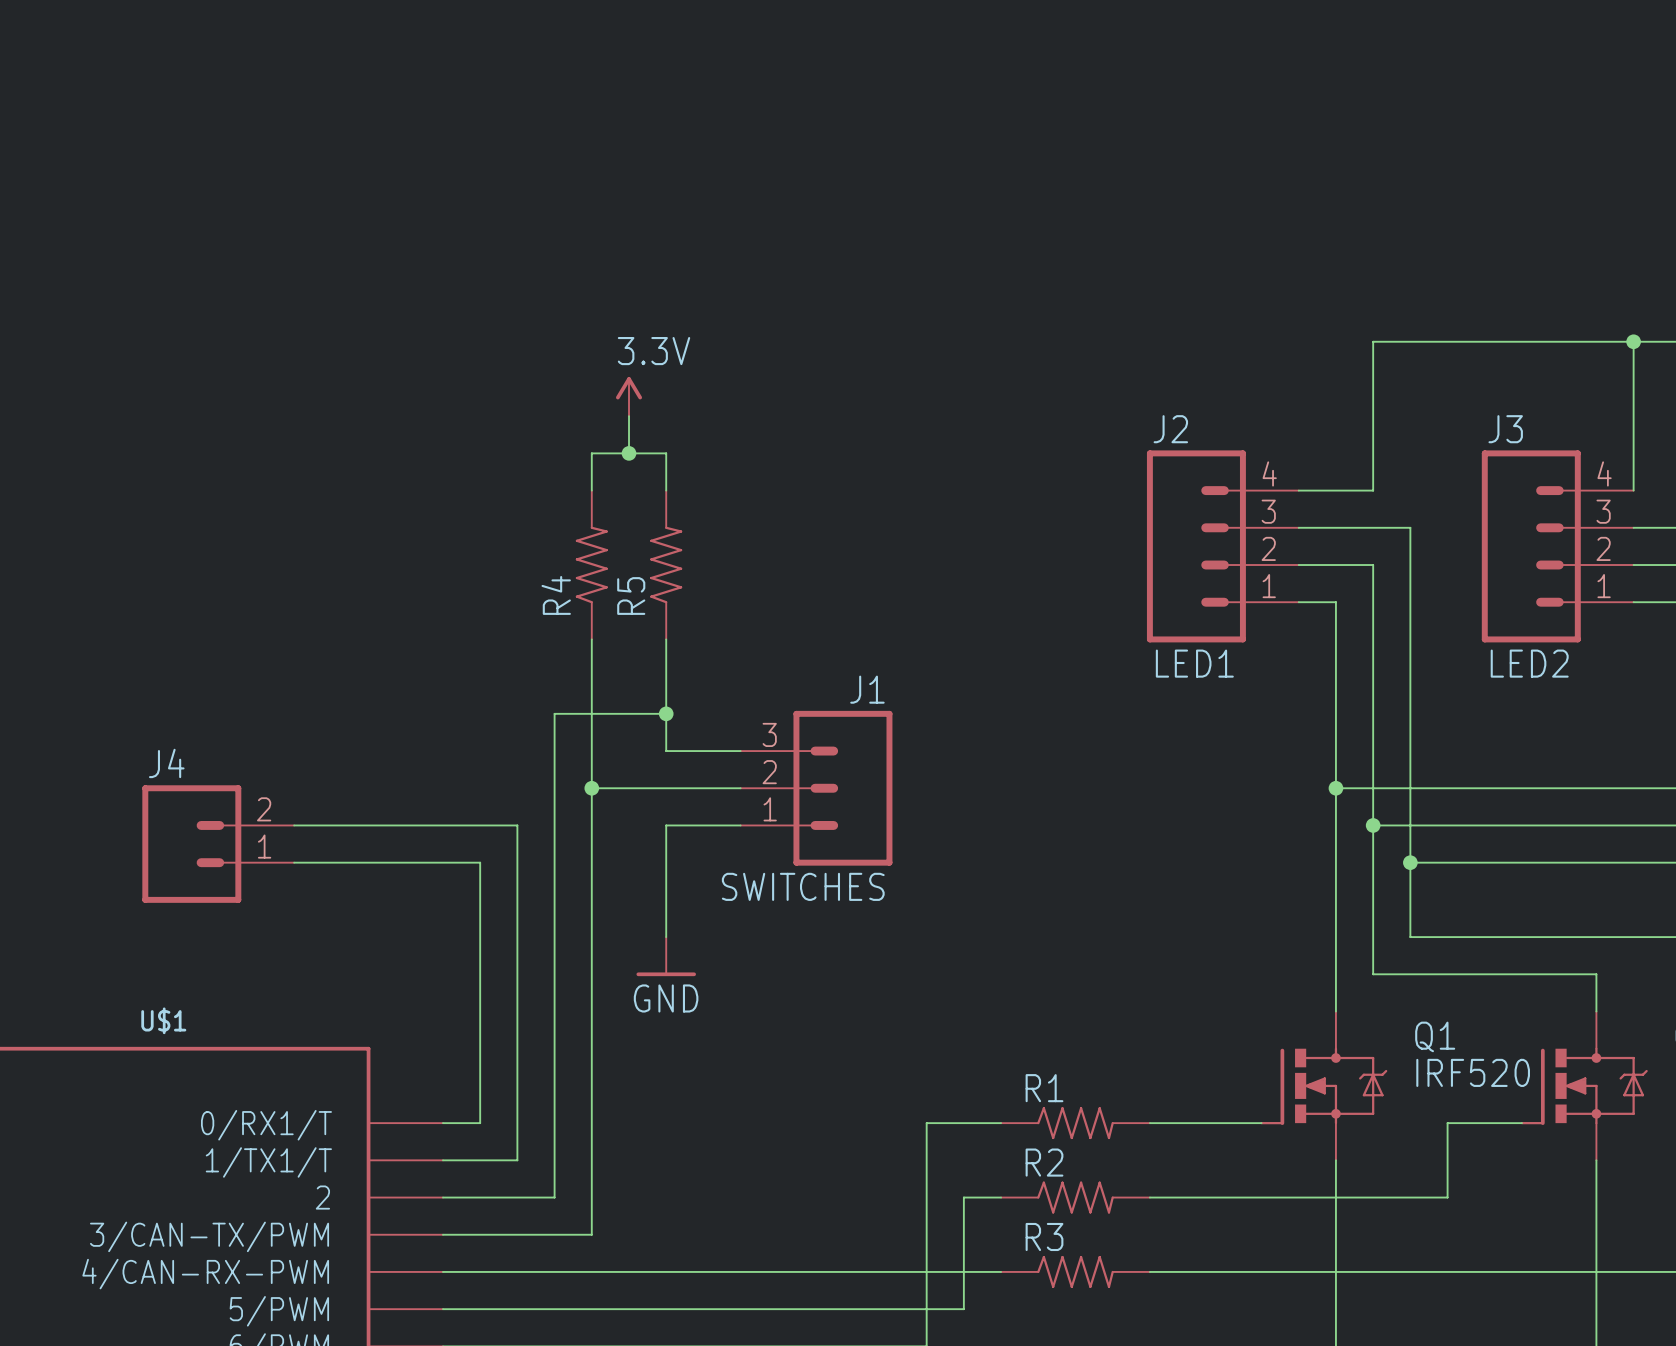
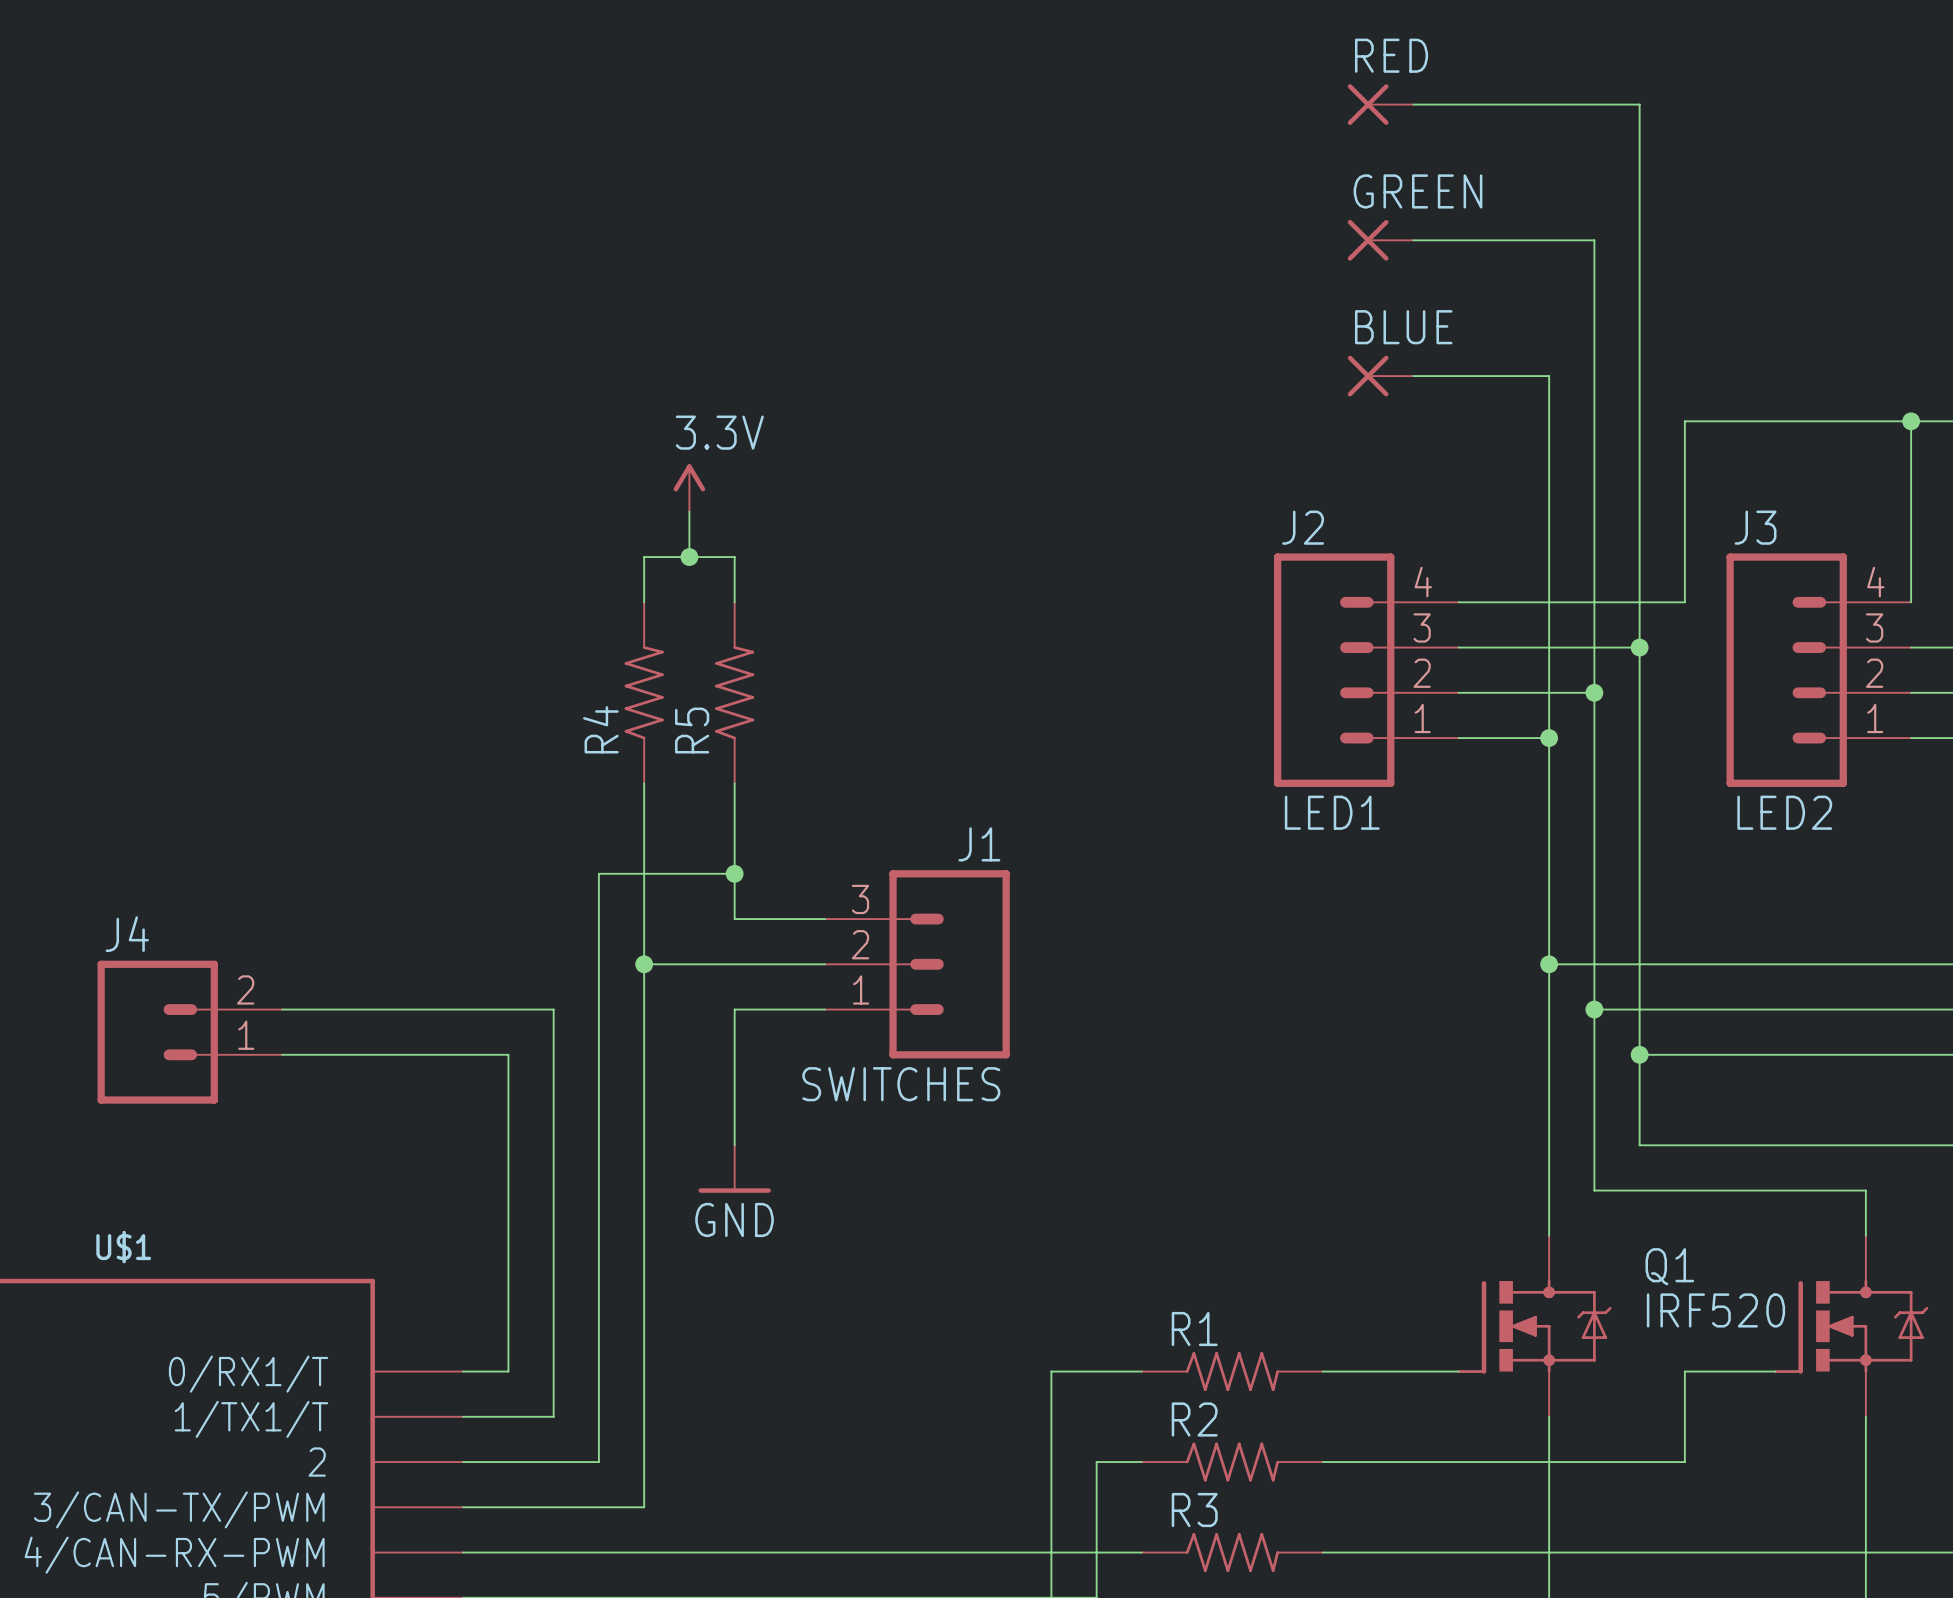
RED: none -> (1380, 104)
wire: none -> (1413, 104) (1639, 104) (1639, 647)
GREEN: none -> (1380, 240)
wire: none -> (1413, 240) (1594, 240) (1594, 421)
BLUE: none -> (1380, 376)
wire: none -> (1413, 376) (1549, 376) (1549, 738)
wire: (1373, 341) (1447, 341) -> (1594, 692) (1594, 602) (1684, 602) (1684, 421)
junction: none -> (1639, 647)
J2 position: (1222, 546) -> (1366, 670)
junction: none -> (1594, 692)
junction: none -> (1549, 738)

